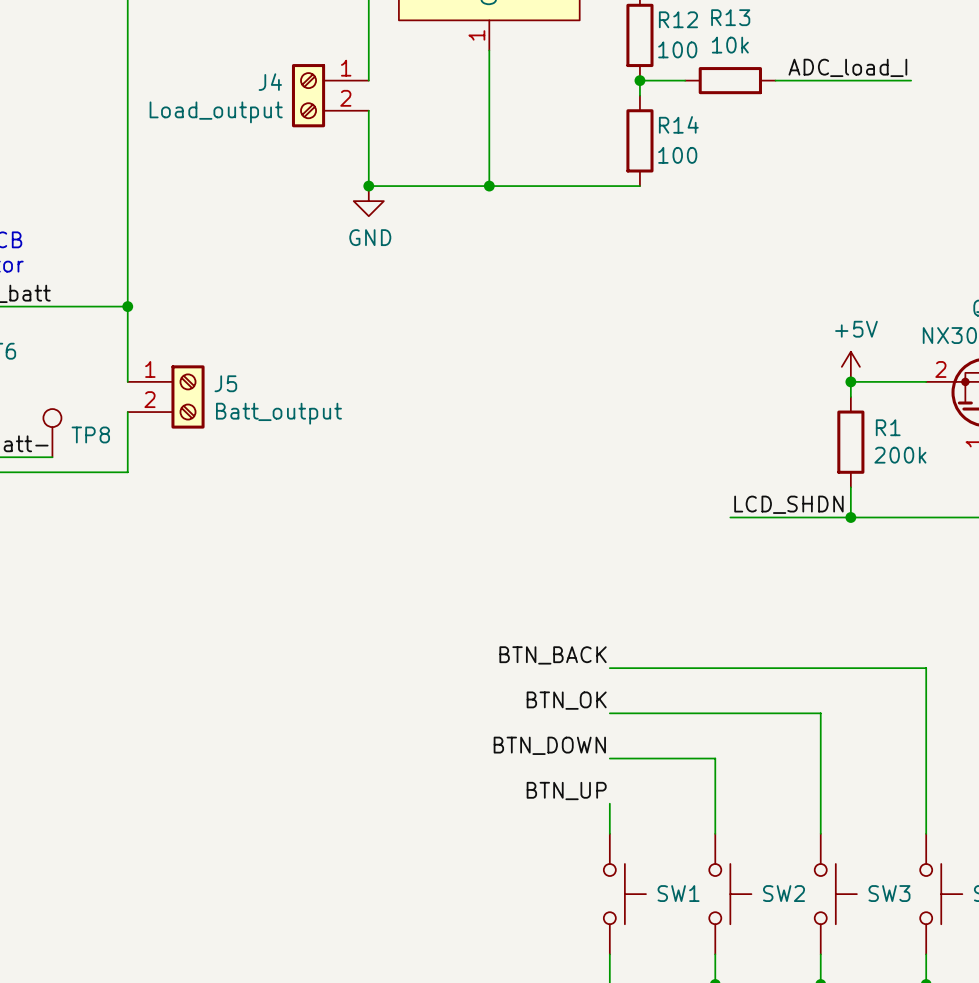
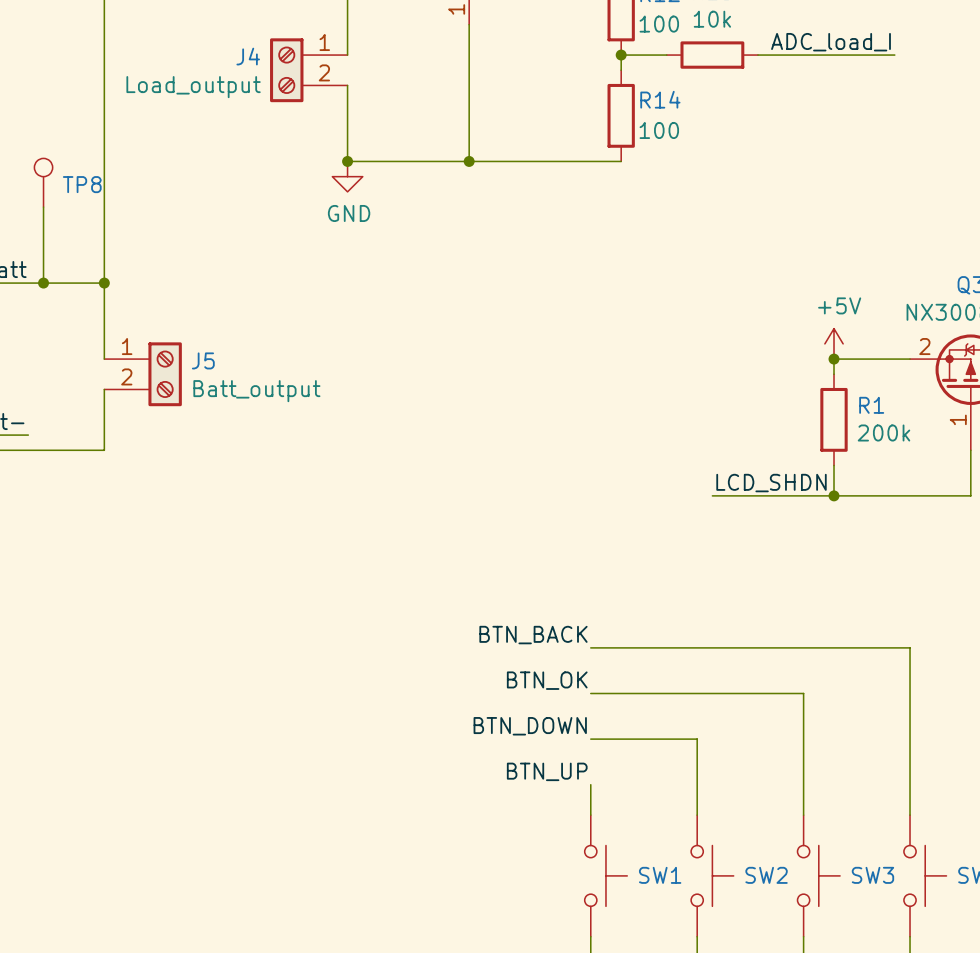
wire: none -> (43, 207) (43, 283)
junction: none -> (43, 283)
TP8 position: (52, 433) -> (43, 182)

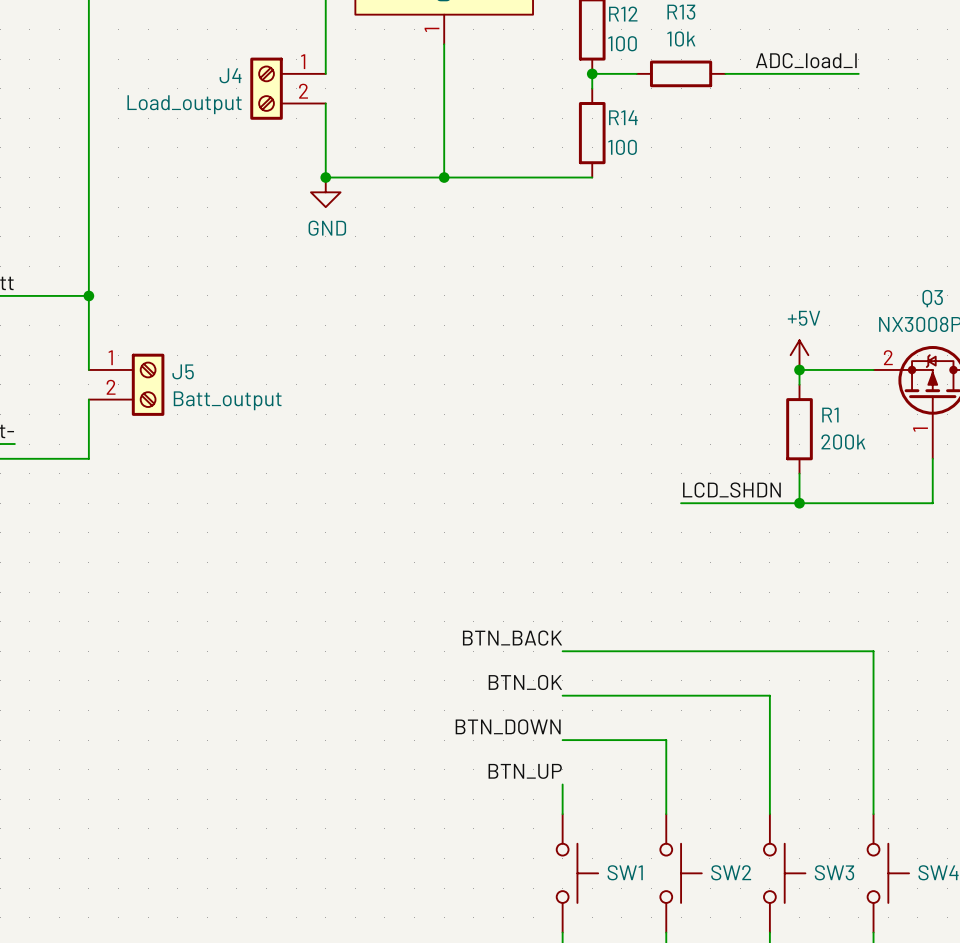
TP8: (43, 182) -> none
wire: (43, 207) (43, 283) -> none
junction: (43, 283) -> none

